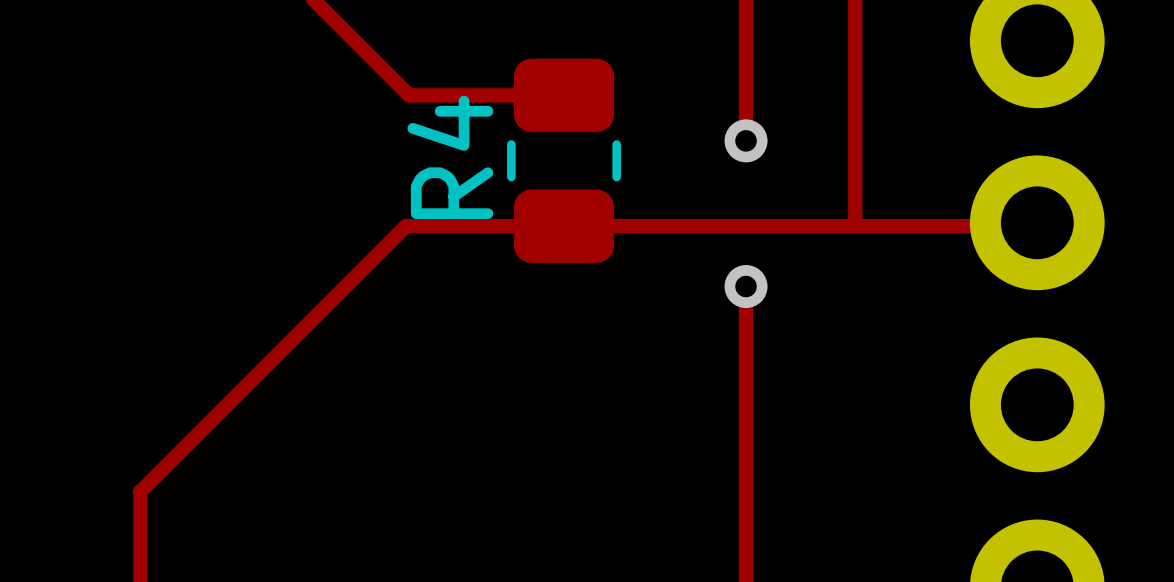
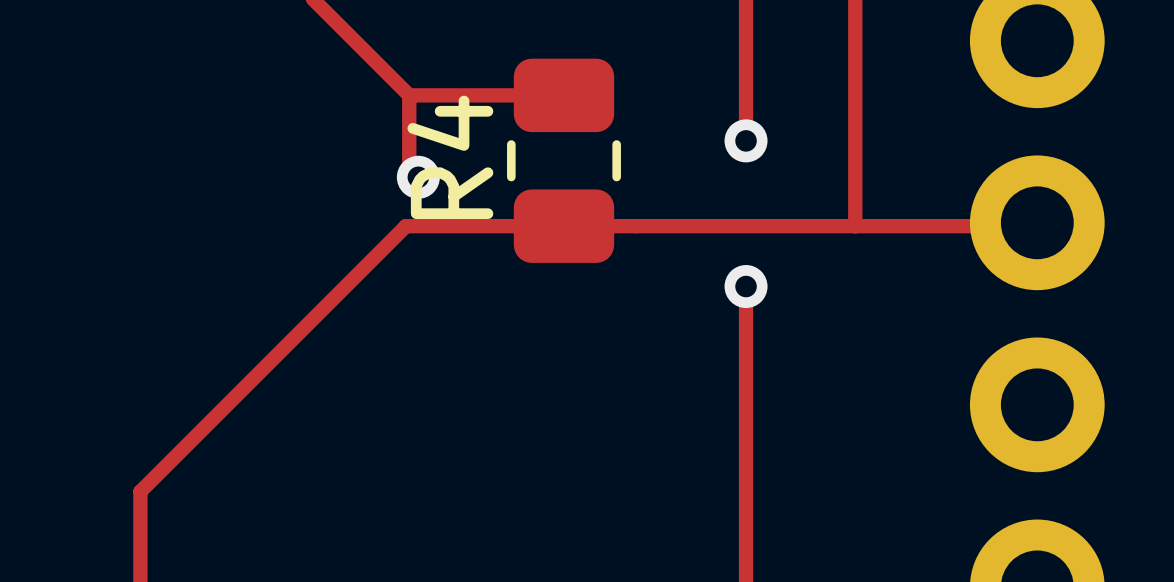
track: none -> (409, 95) (409, 168) (418, 177)
via: none -> (418, 177)

